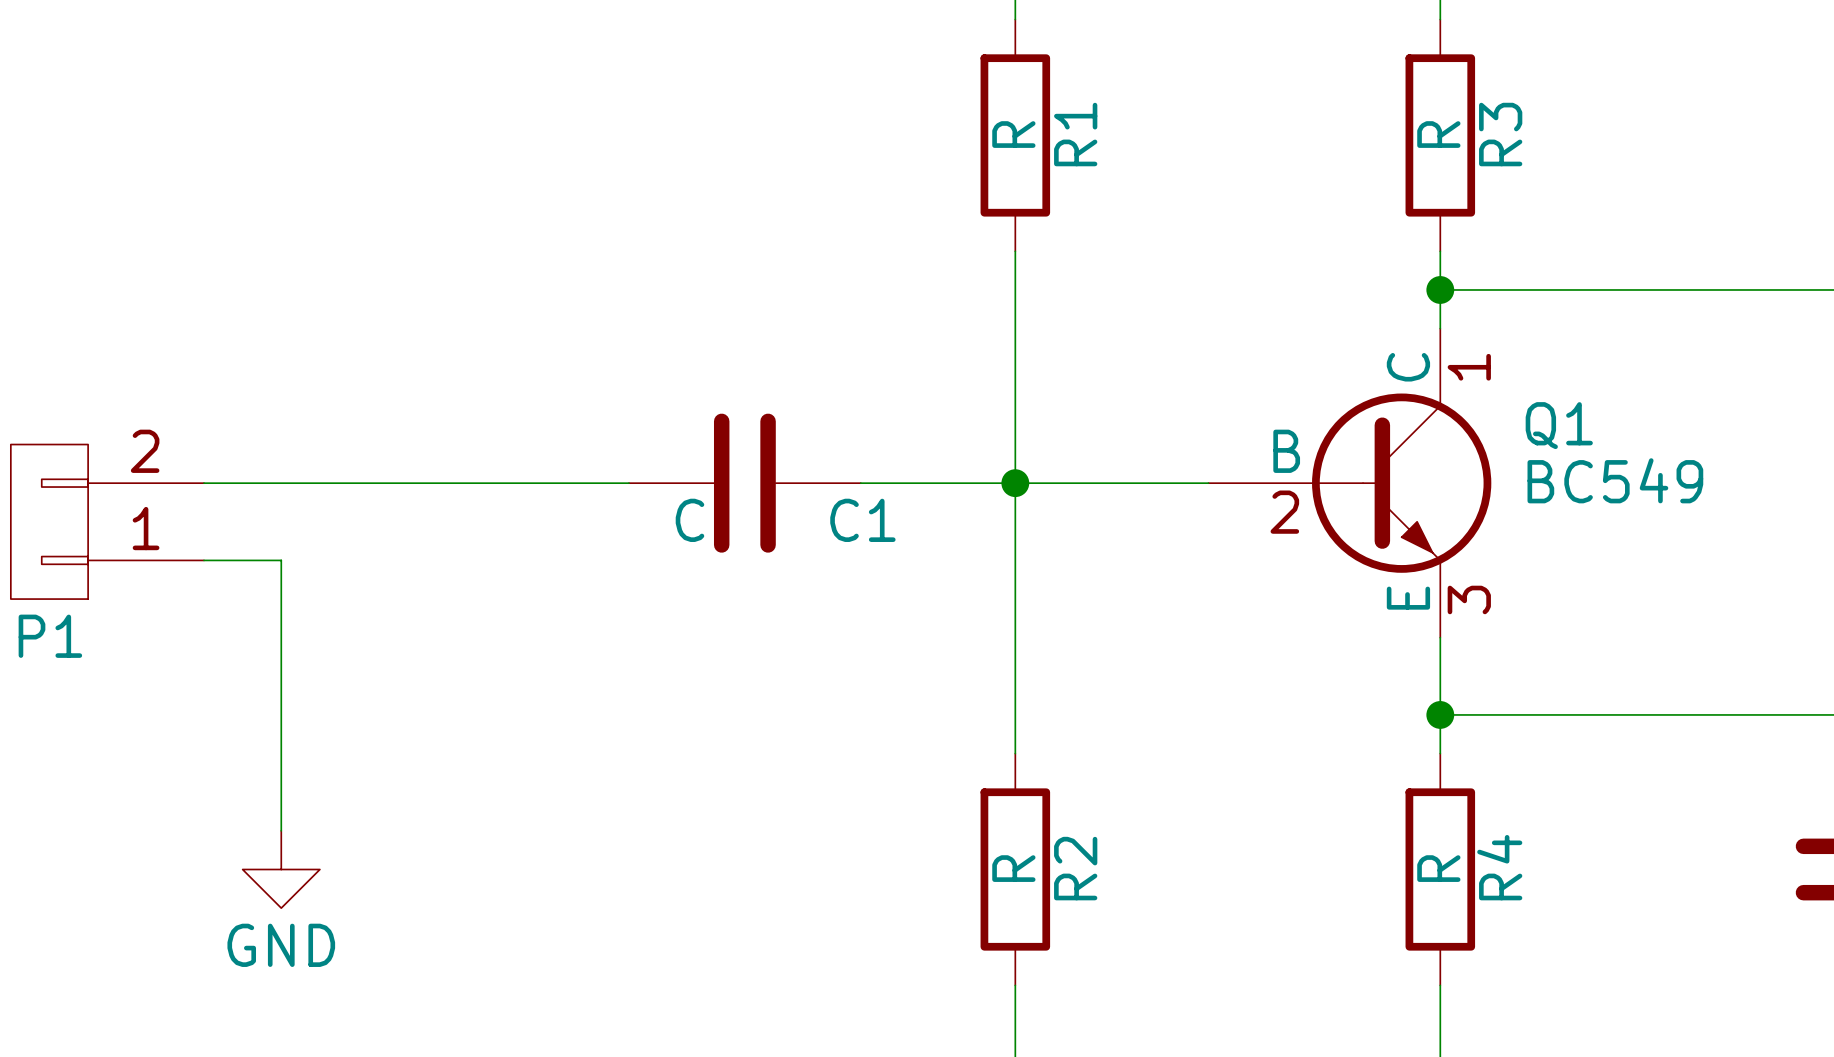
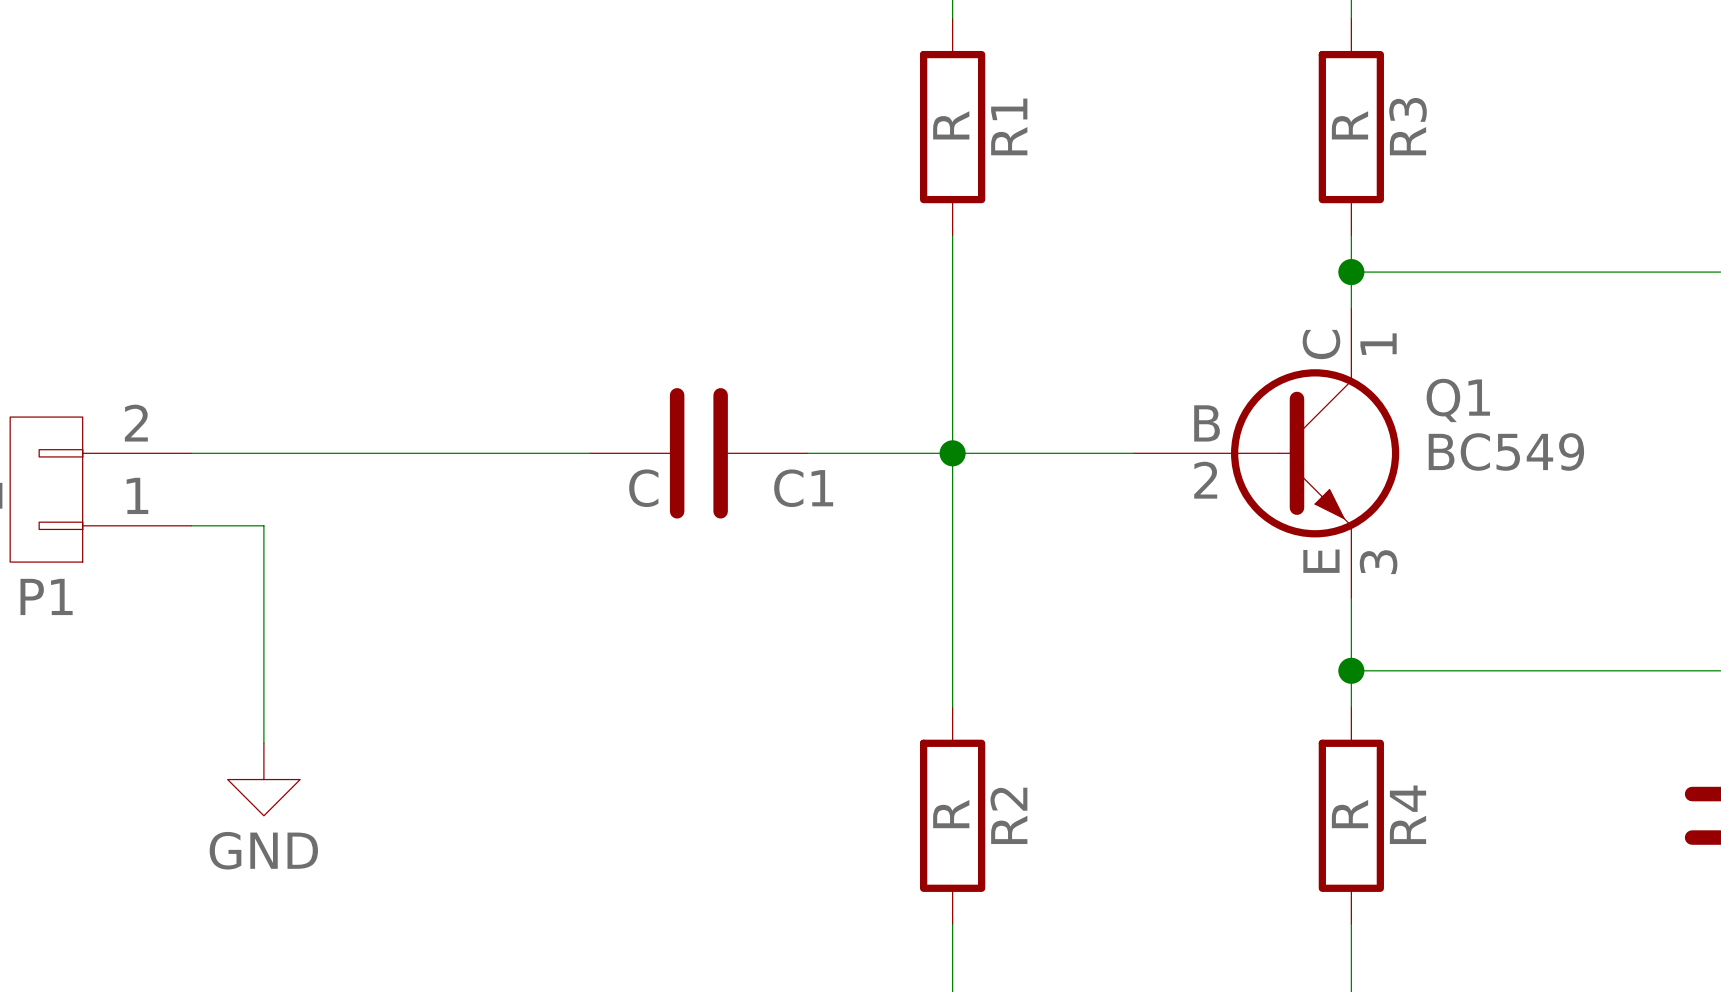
power symbol position: GND (281, 869) -> GND (263, 779)

